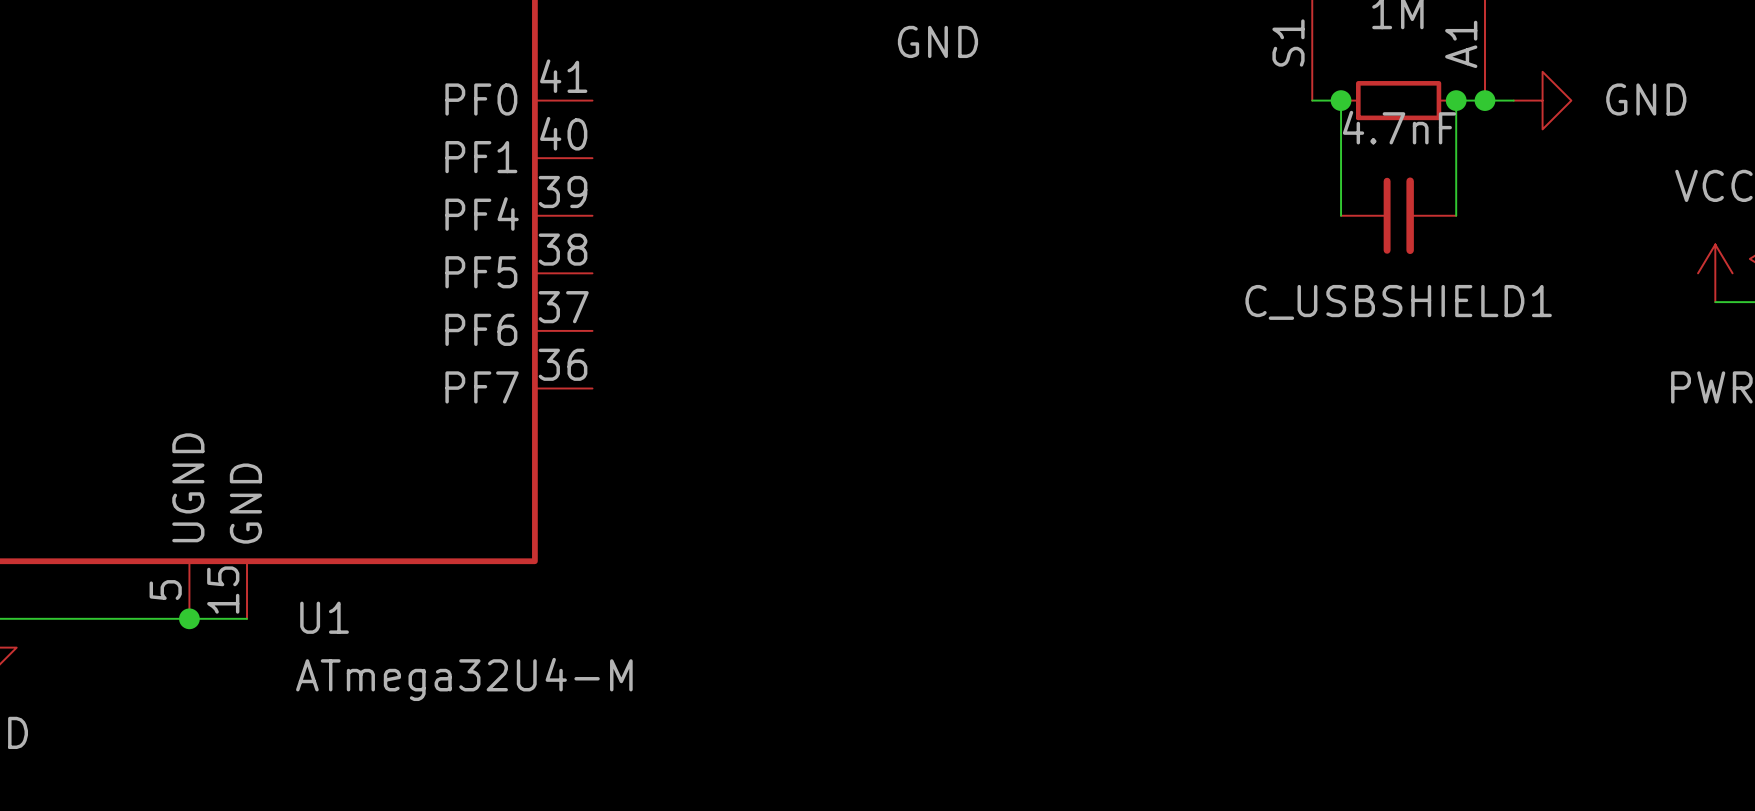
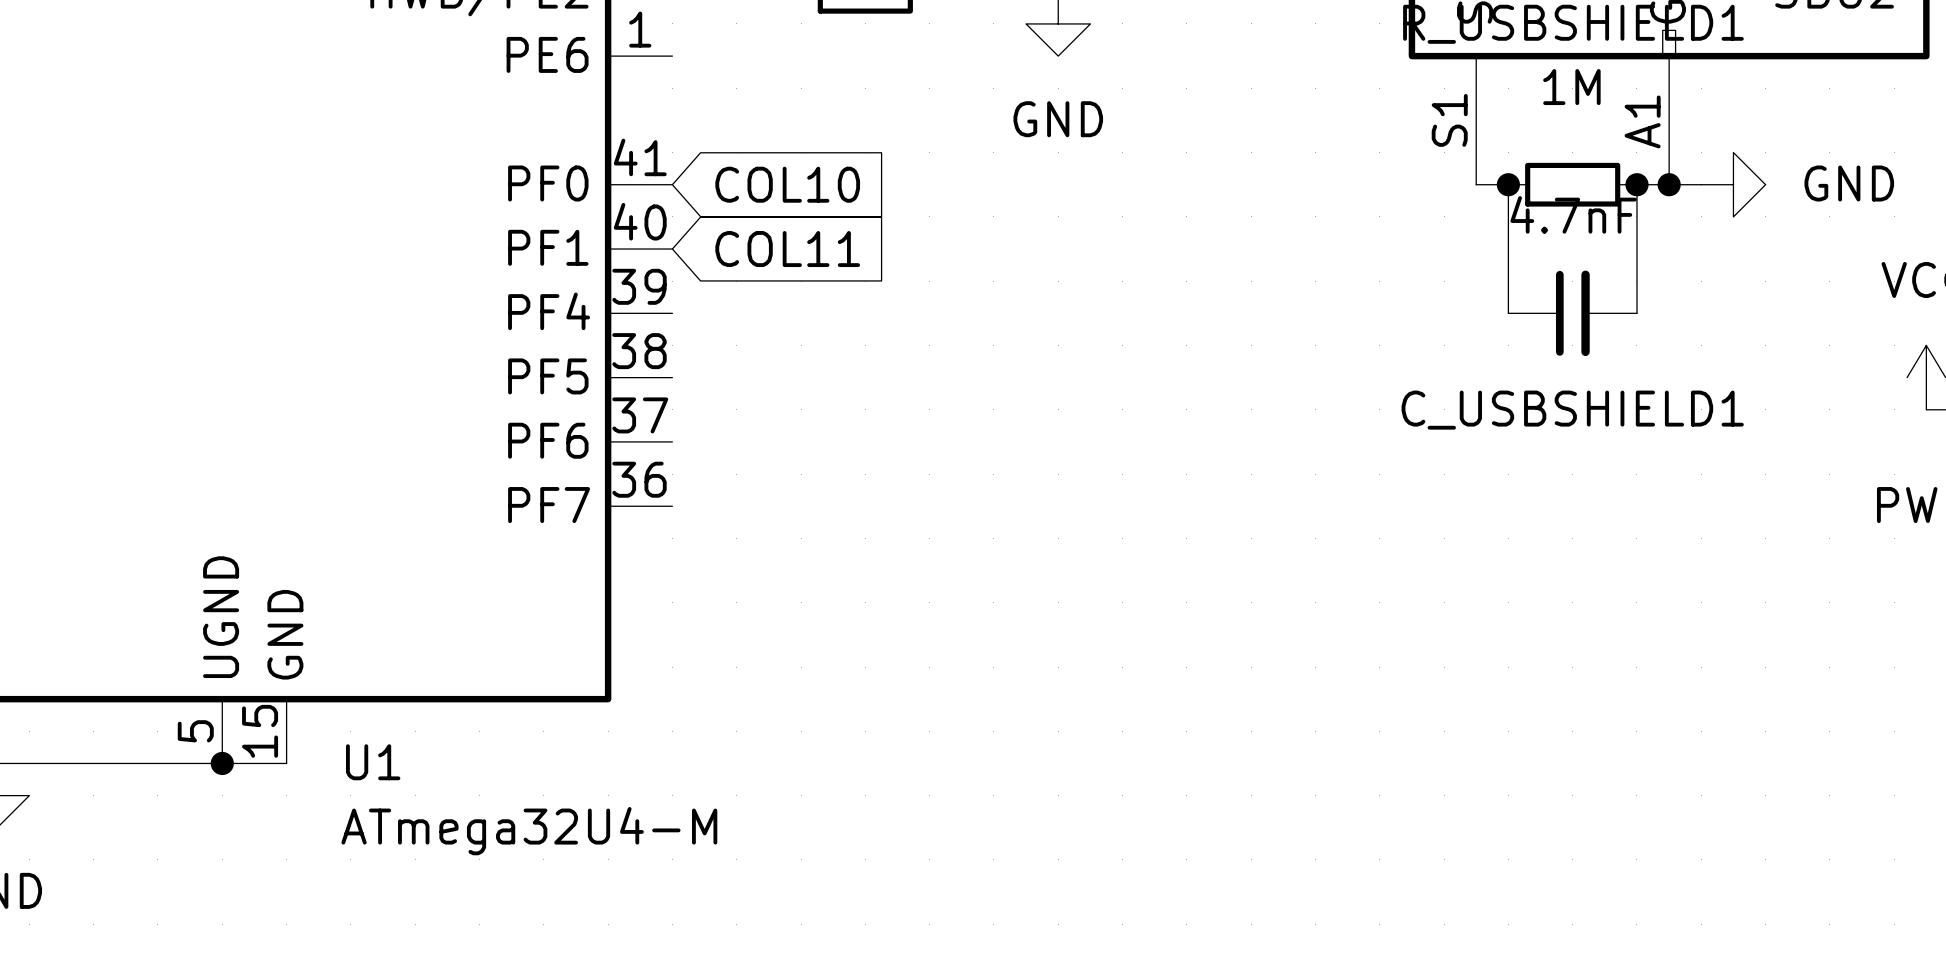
global label: none -> COL10 (787, 184)
global label: none -> COL11 (787, 249)

